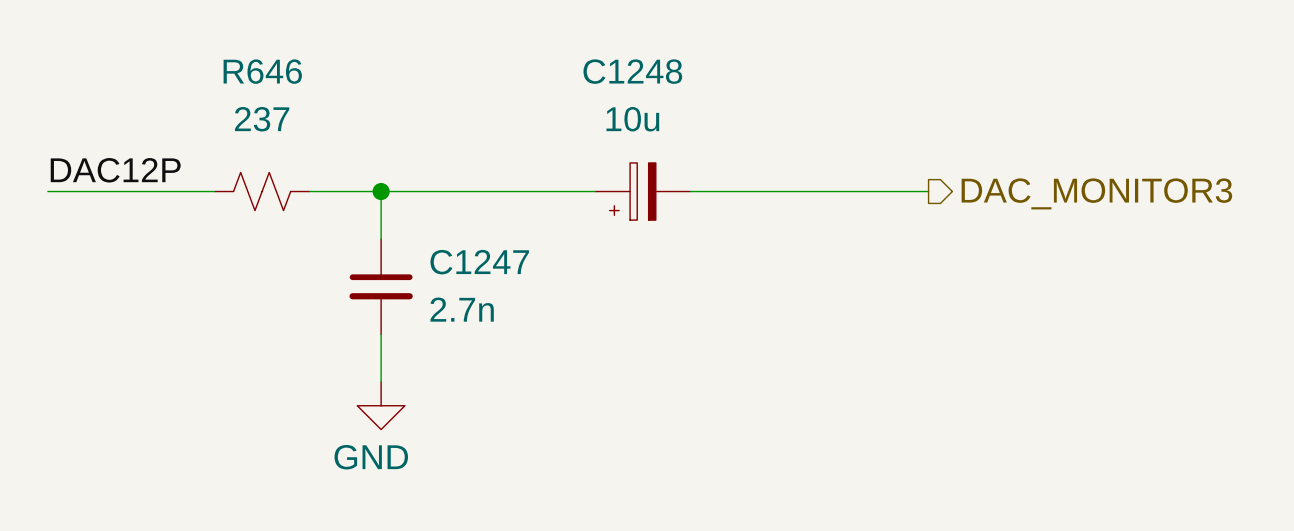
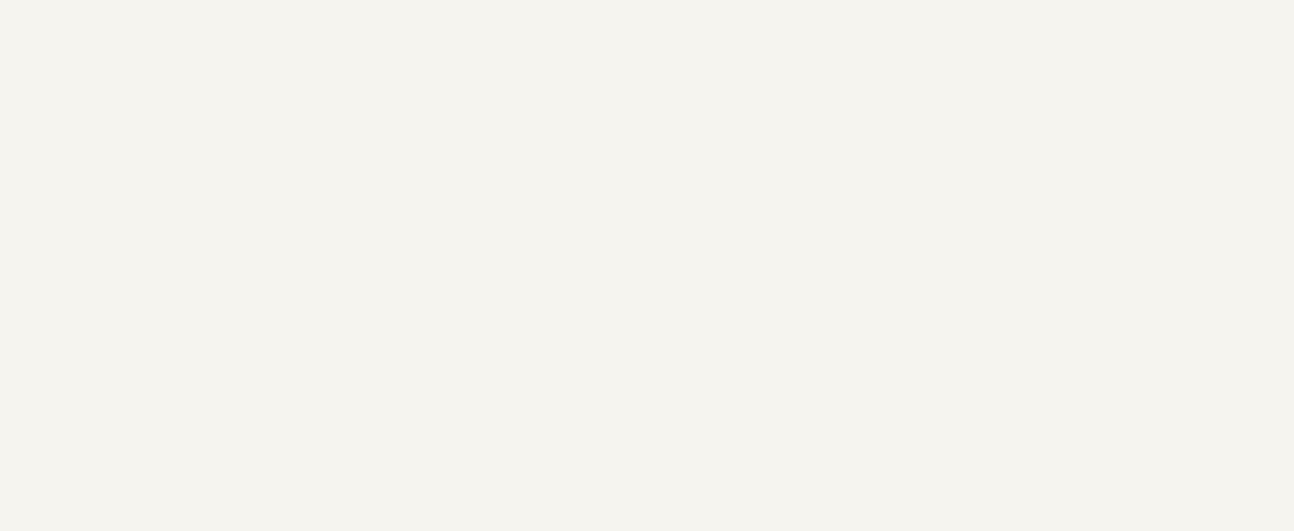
label: DAC12P (115, 170) -> none
wire: (47, 191) (214, 191) -> none
R646: 237 (262, 191) -> none
wire: (309, 191) (595, 191) -> none
wire: (381, 191) (381, 239) -> none
junction: (381, 191) -> none
C1248: 10u (642, 191) -> none
wire: (690, 191) (928, 191) -> none
hierarchical label: DAC_MONITOR3 (1096, 193) -> none
C1247: 2.7n (381, 286) -> none
wire: (381, 334) (381, 381) -> none
power symbol: GND (381, 405) -> none

